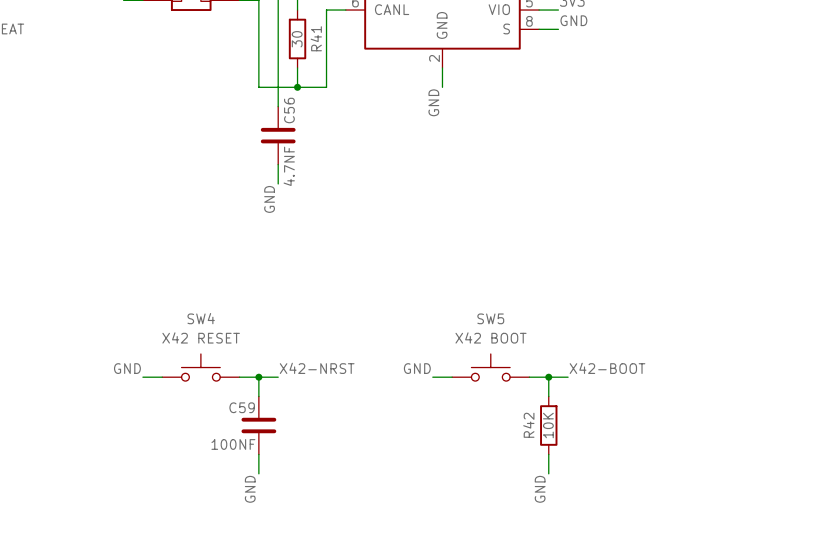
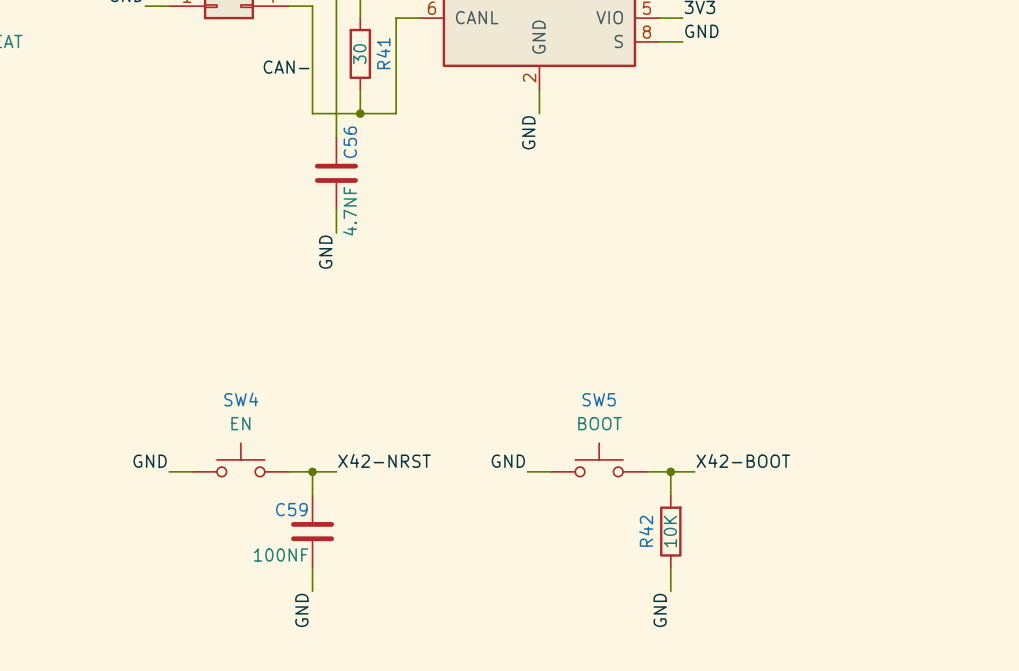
label: none -> CAN- (286, 67)
SW4 value: X42 RESET (201, 337) -> EN (240, 423)
SW5 value: X42 BOOT (491, 337) -> BOOT (599, 423)

